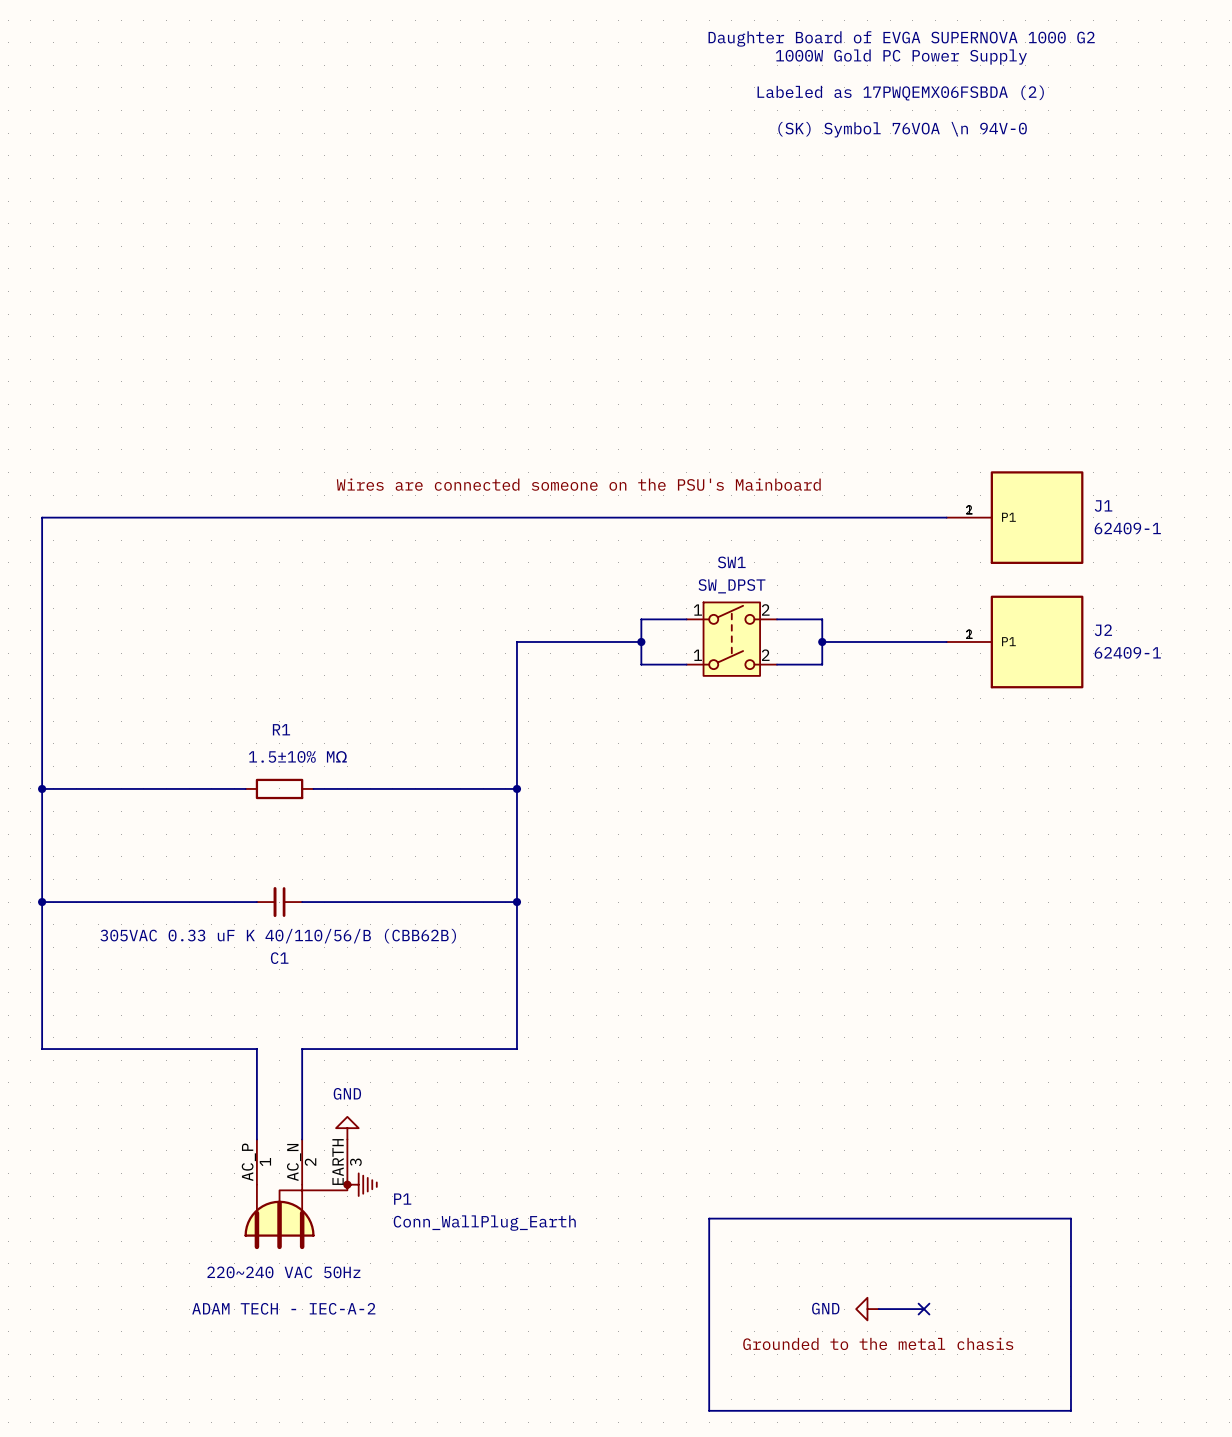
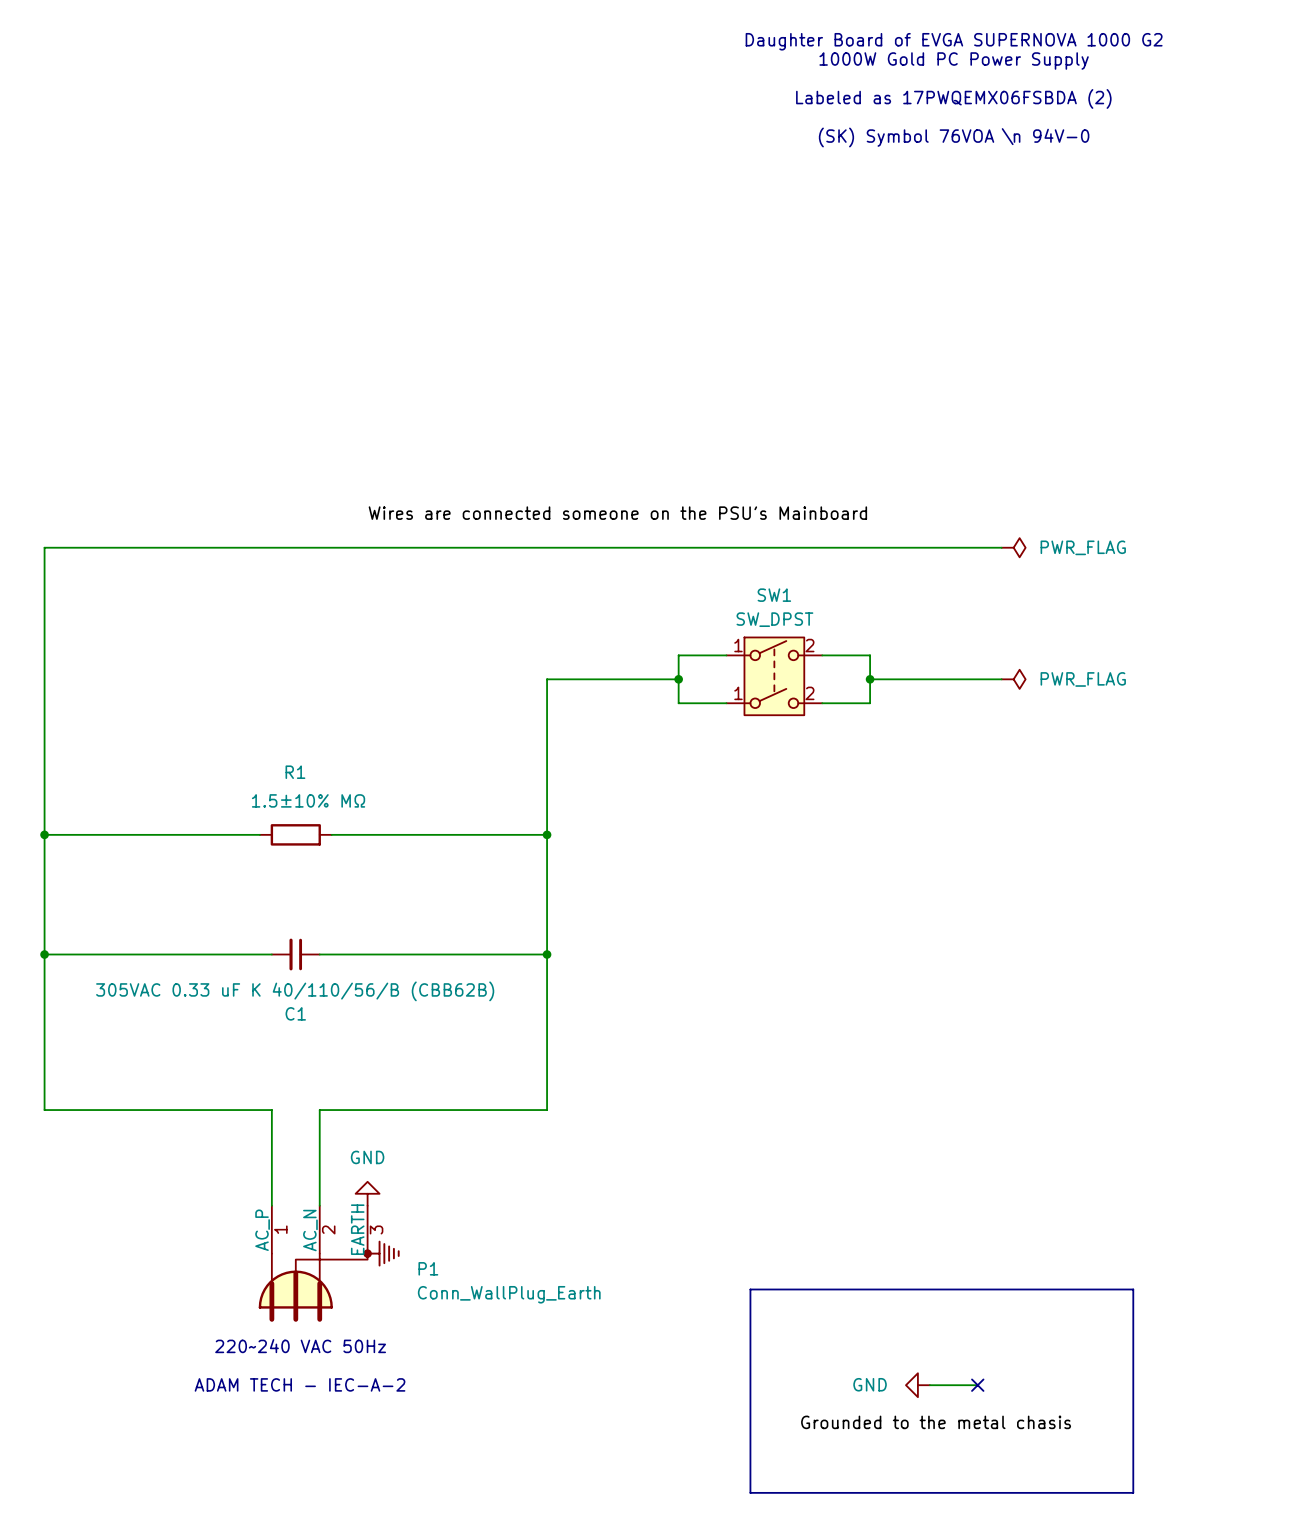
power symbol: none -> PWR_FLAG (1013, 547)
J1: 62409-1 (1015, 517) -> none
power symbol: none -> PWR_FLAG (1013, 679)
J2: 62409-1 (1015, 641) -> none

